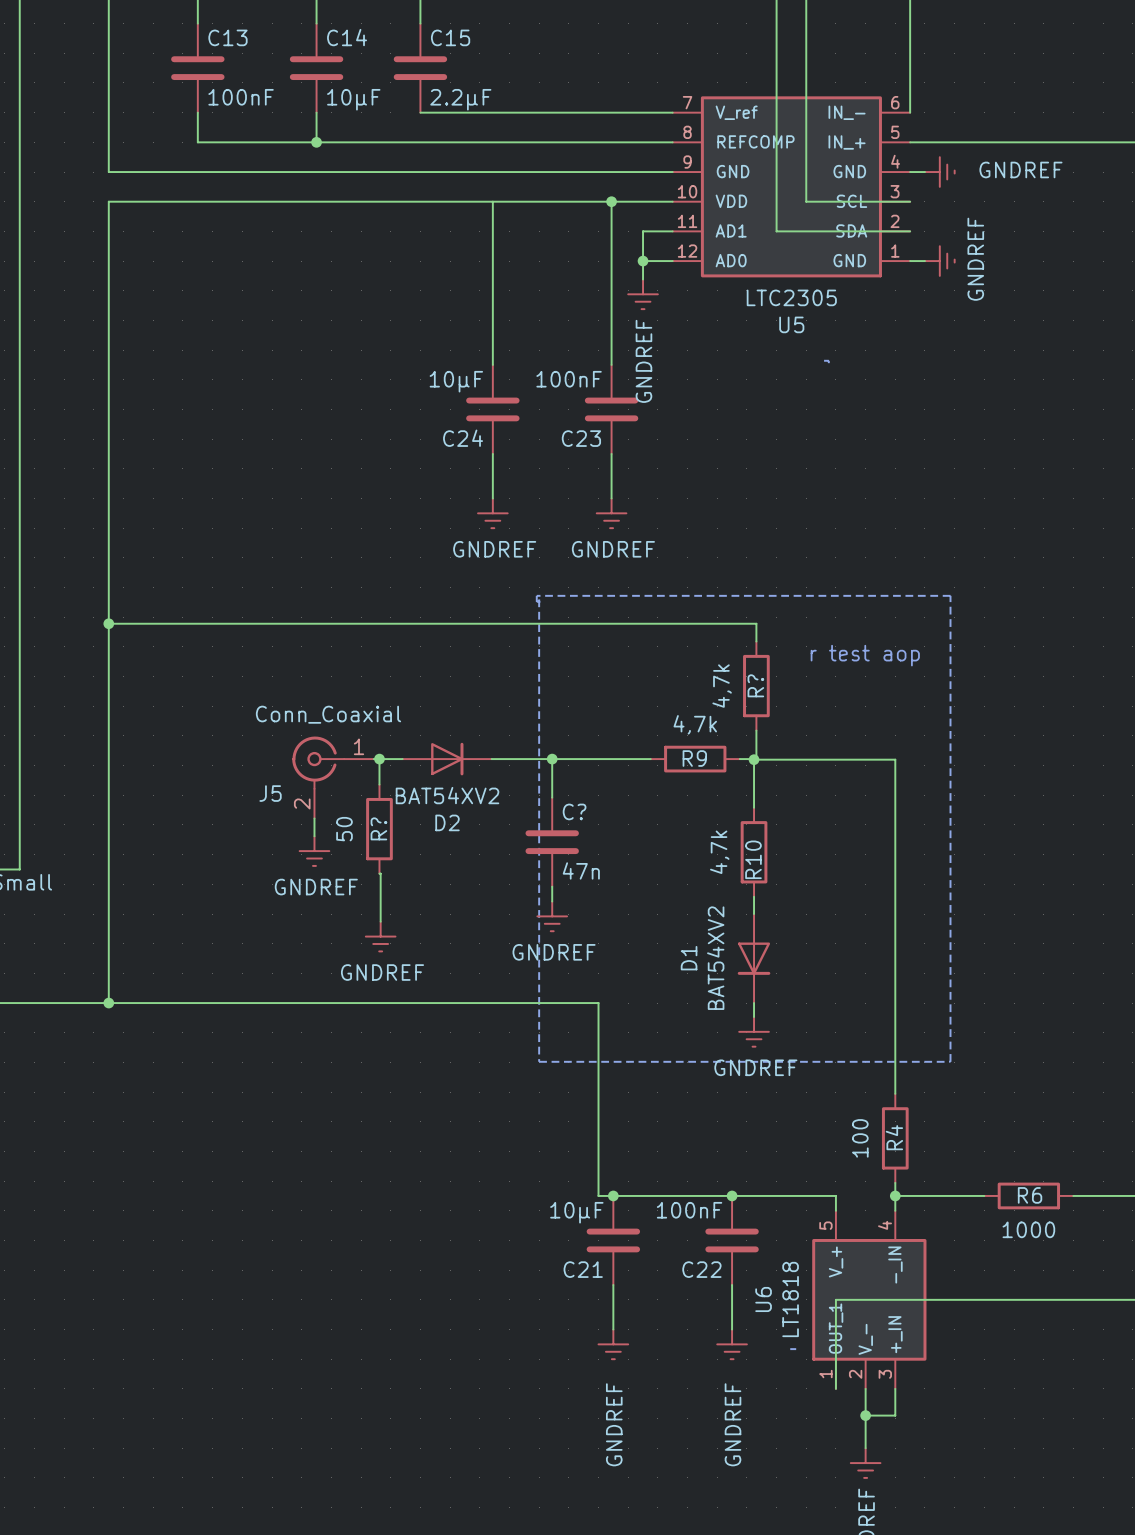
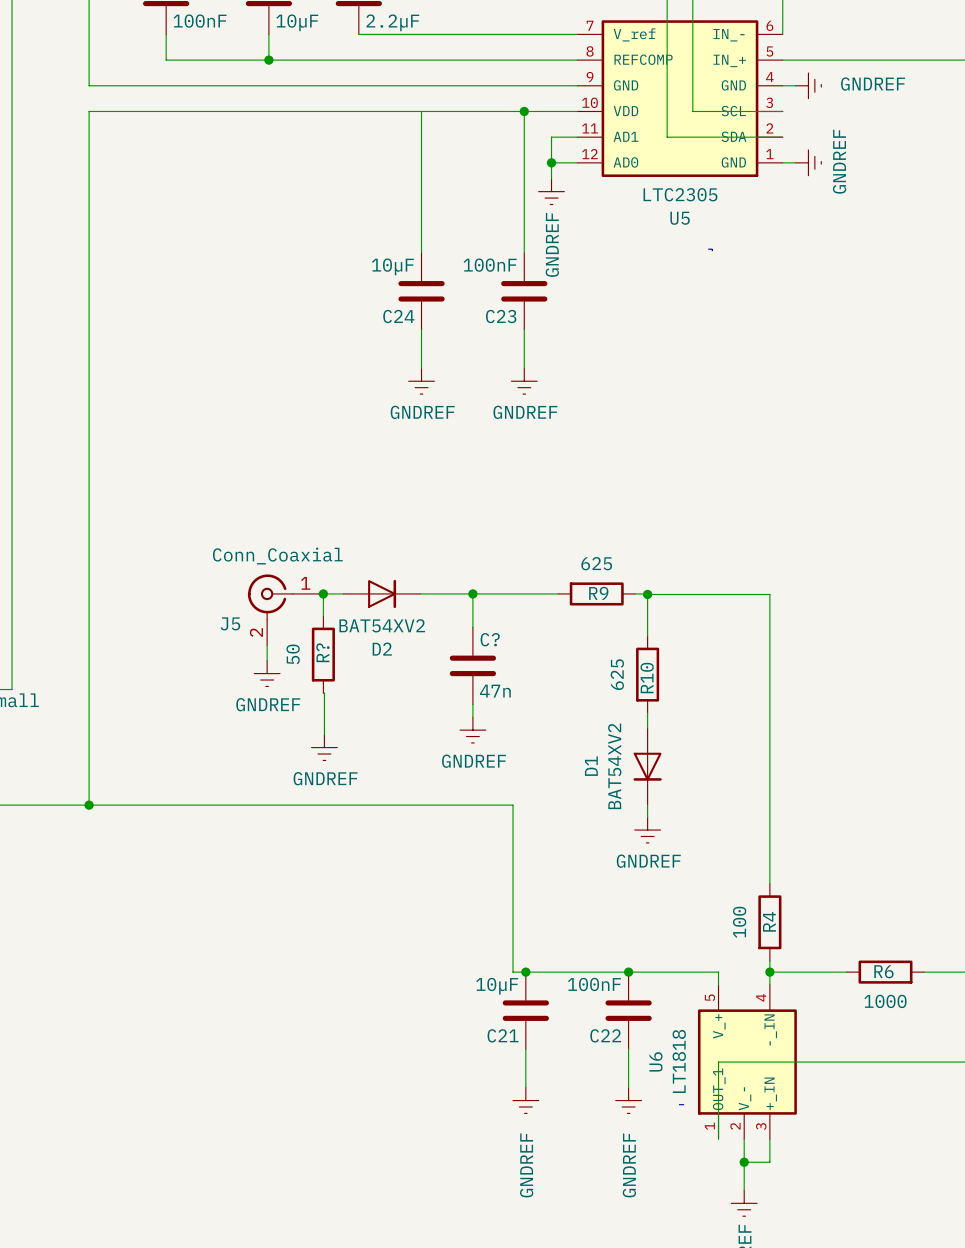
line: (539, 599) (539, 1061) (950, 1061) (950, 595) (536, 595) (536, 601) (540, 601) -> none
wire: (108, 623) (756, 623) (756, 641) -> none
junction: (108, 623) -> none
text: r test aop (865, 655) -> none
R?: 4,7k (756, 686) -> none
R9 value: 4,7k (695, 724) -> 625 (596, 563)
wire: (756, 730) (756, 759) -> none
R10 value: 4,7k (719, 852) -> 625 (617, 674)

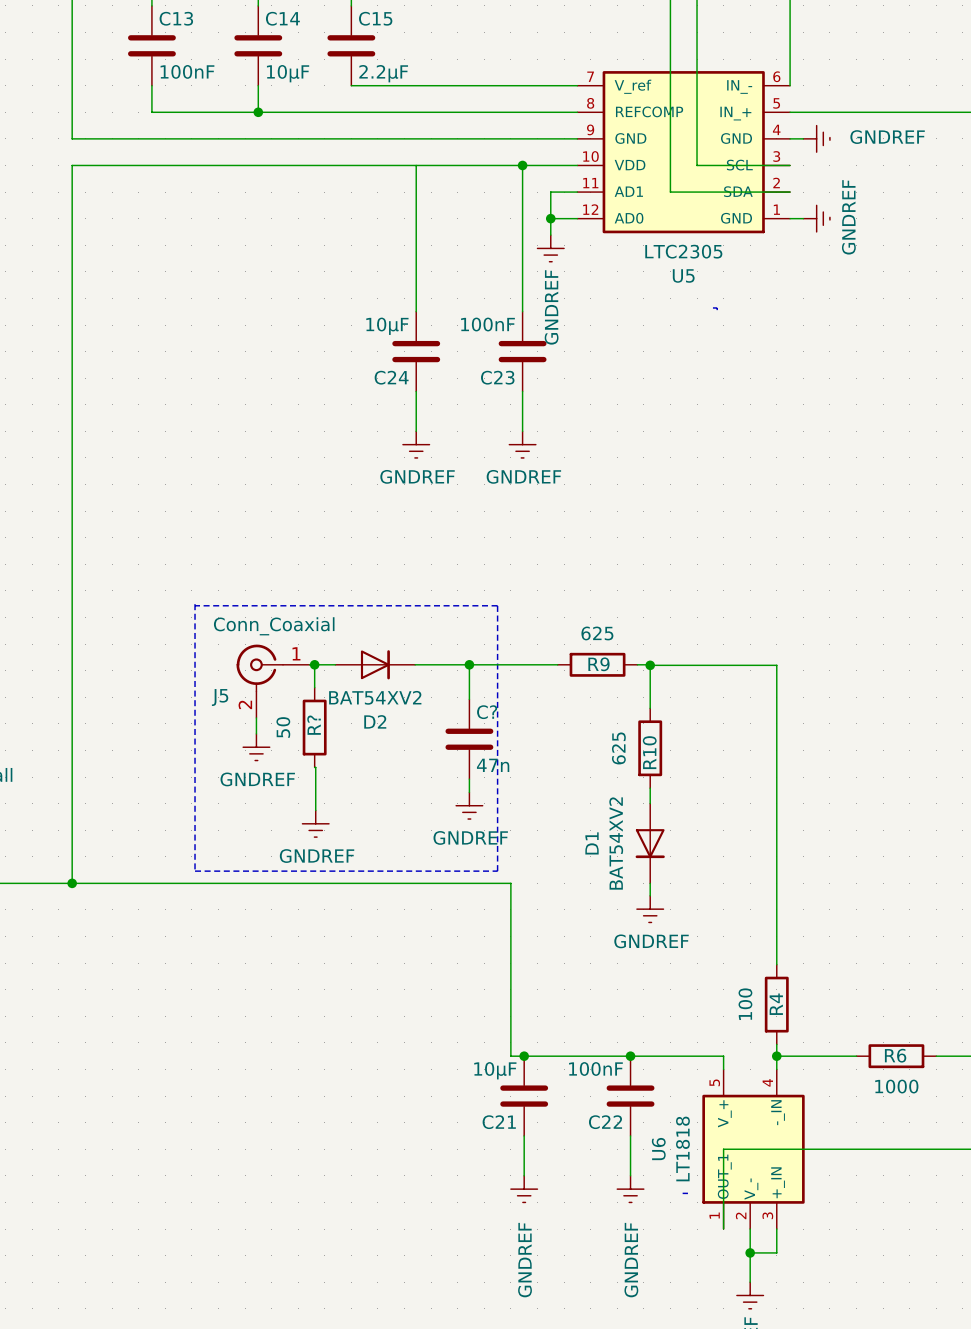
line: none -> (195, 604) (195, 871) (497, 871) (497, 605) (195, 605)

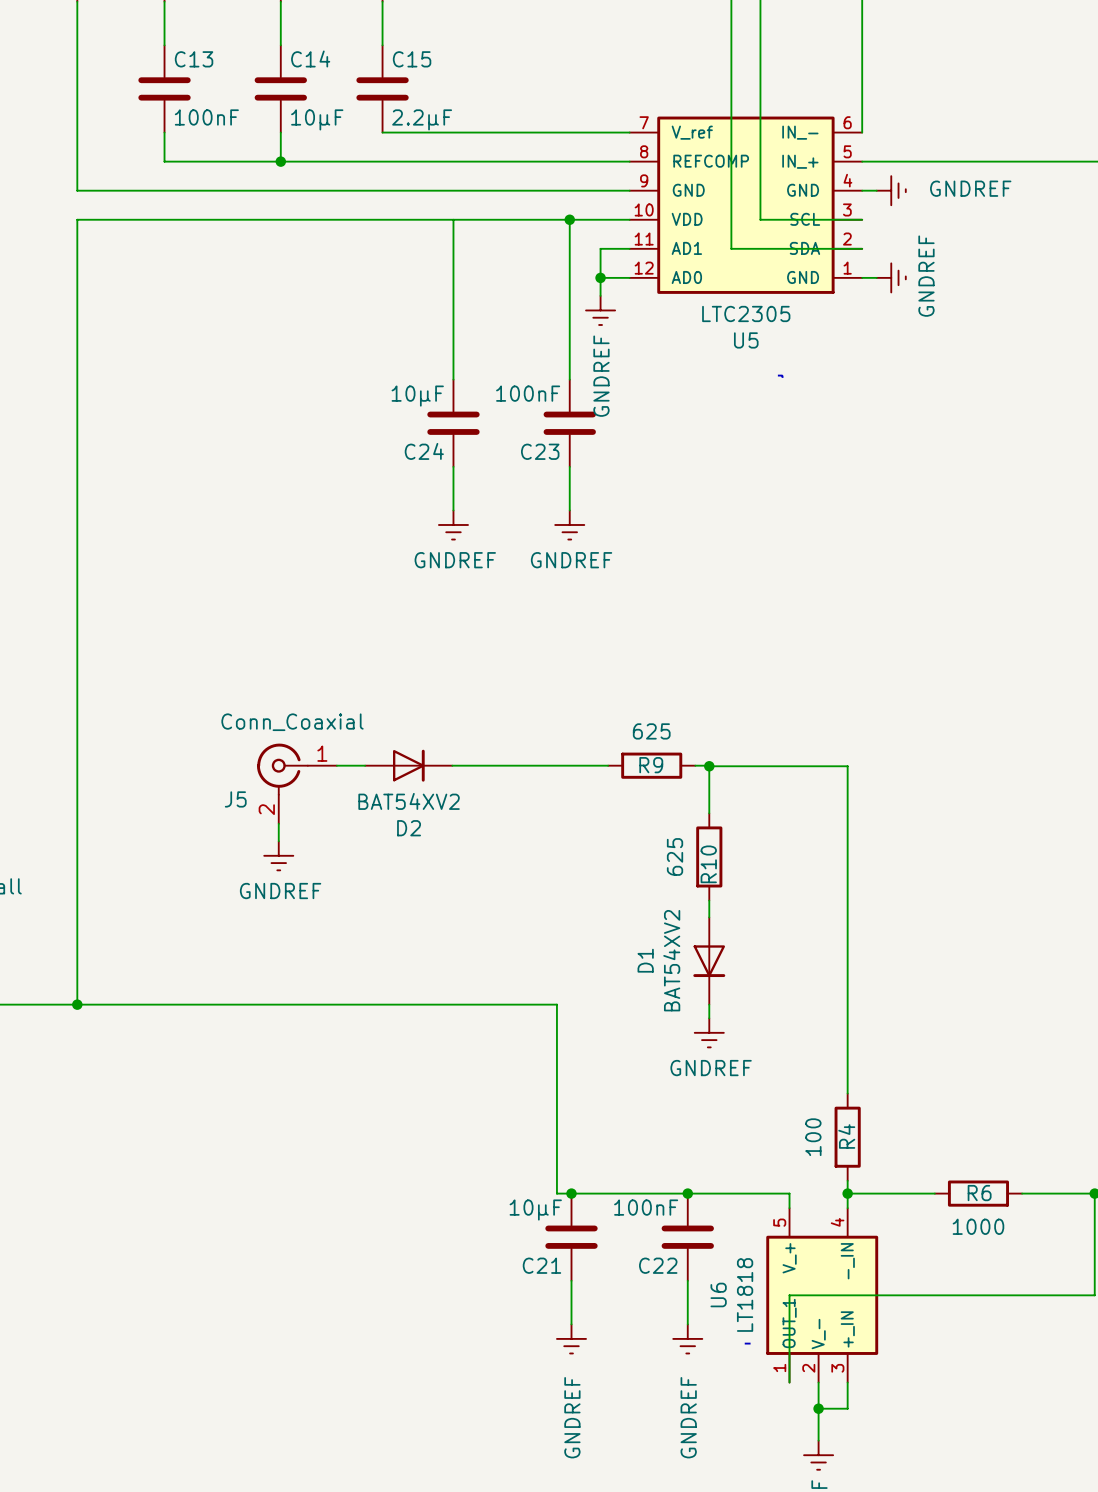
line: (195, 604) (195, 871) (497, 871) (497, 605) (195, 605) -> none
wire: (314, 664) (314, 687) -> none
junction: (314, 664) -> none
wire: (469, 664) (469, 699) -> none
junction: (469, 664) -> none
R?: 50 (314, 727) -> none
C?: 47n (469, 739) -> none
wire: (314, 767) (315, 810) -> none
wire: (469, 779) (469, 792) -> none
power symbol: GNDREF (469, 805) -> none
power symbol: GNDREF (315, 823) -> none

